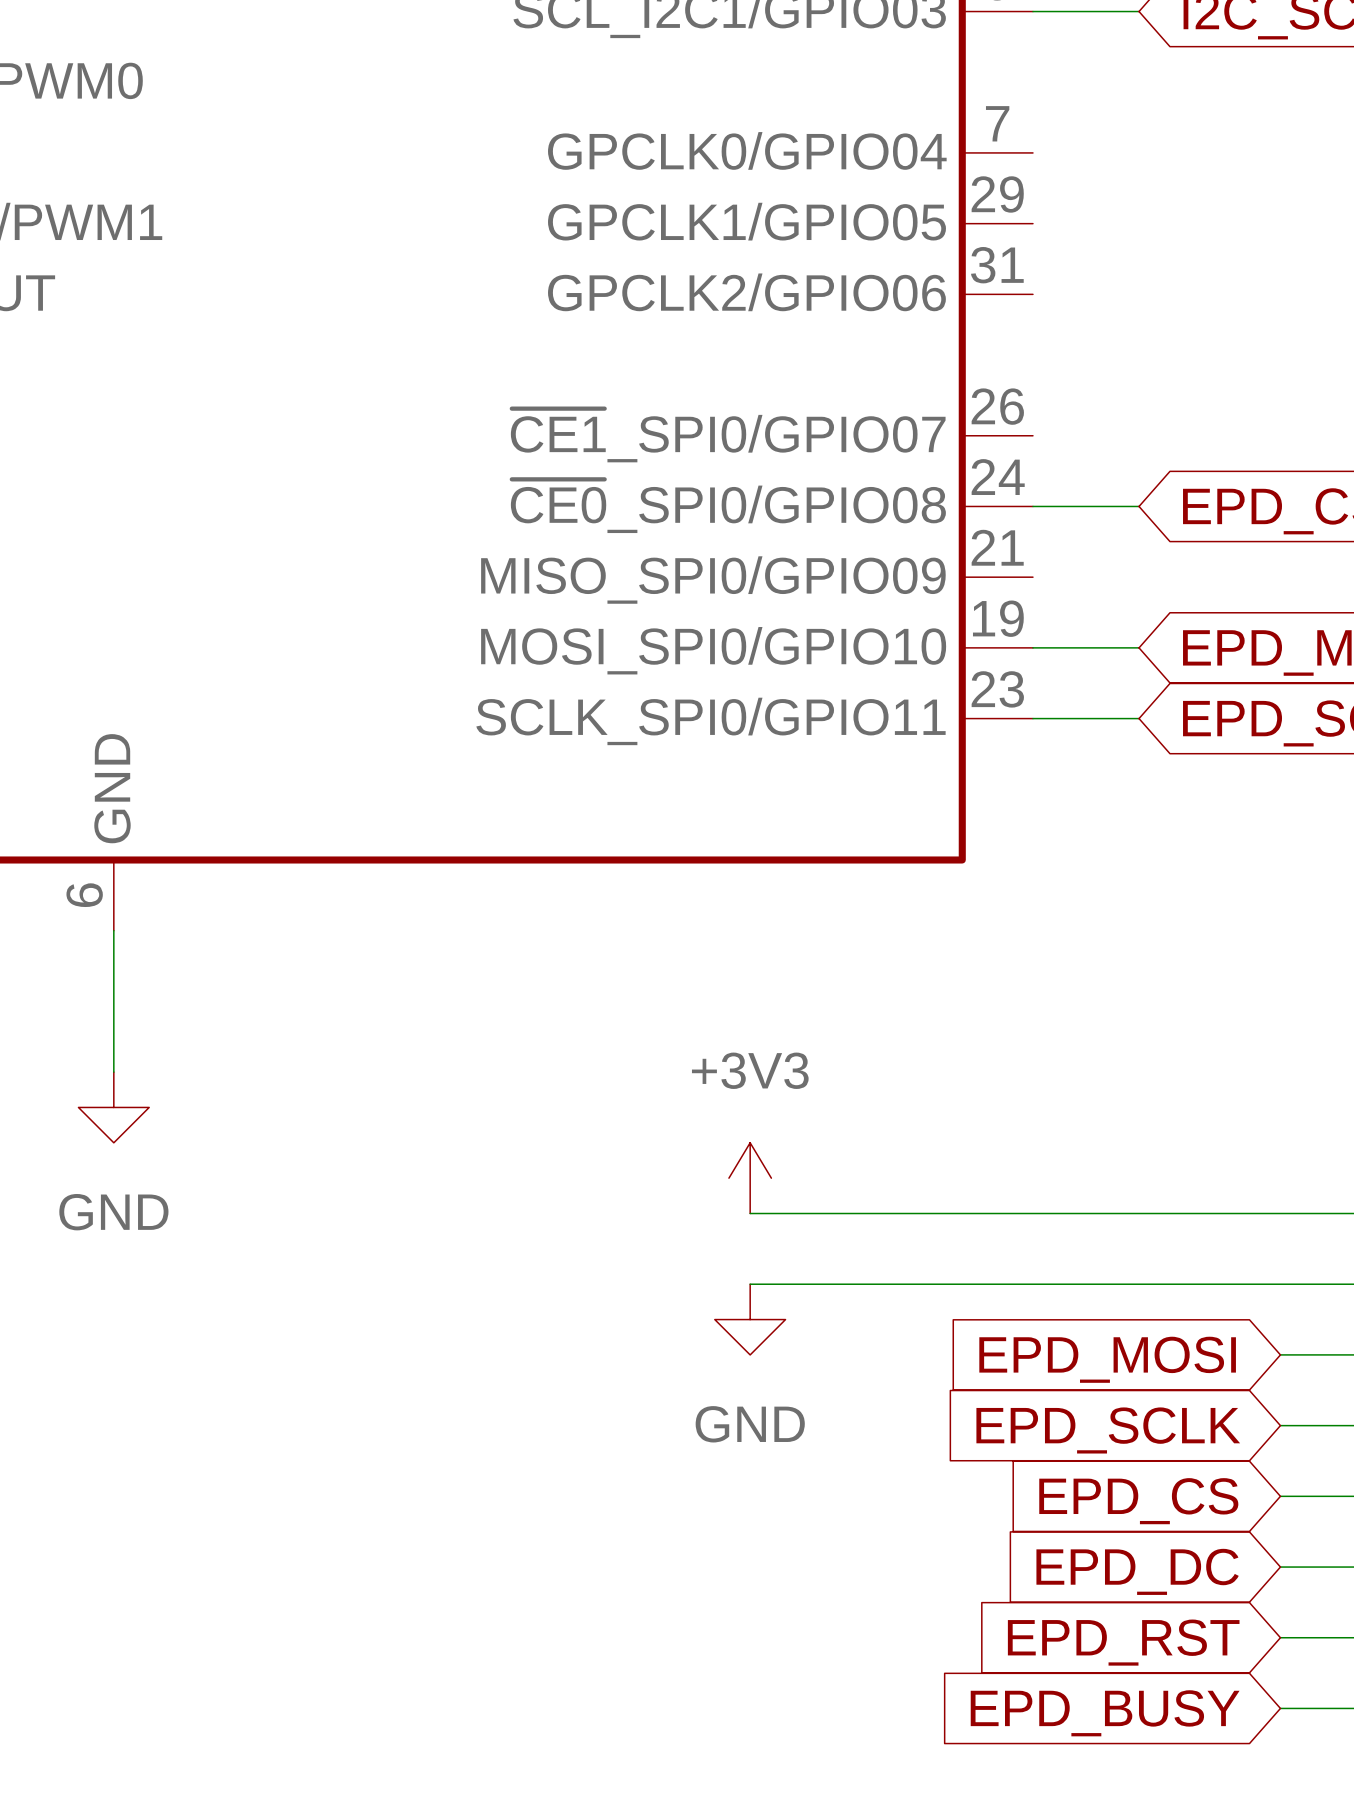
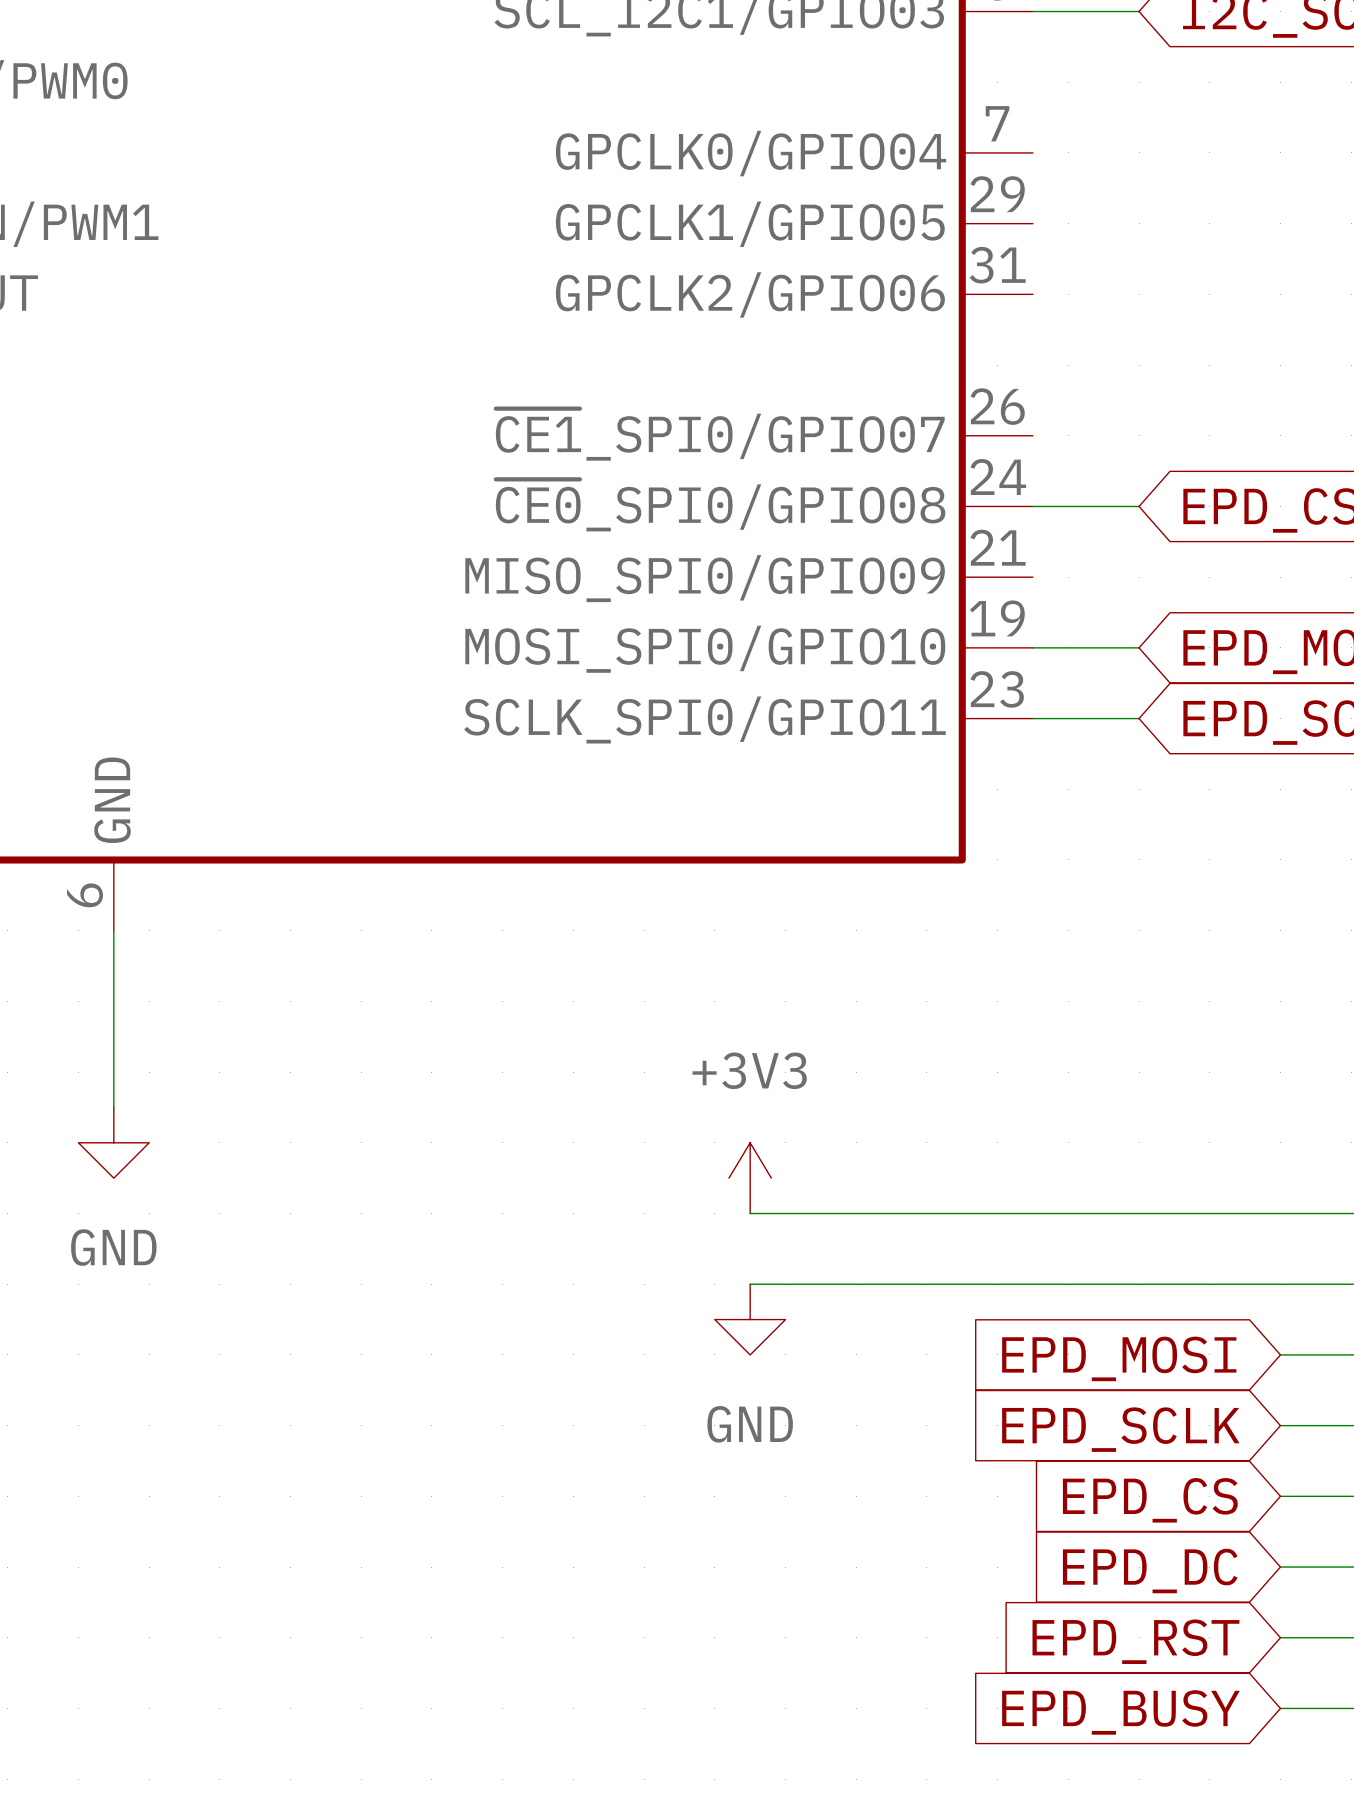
power symbol position: GND (113, 1107) -> GND (113, 1142)

